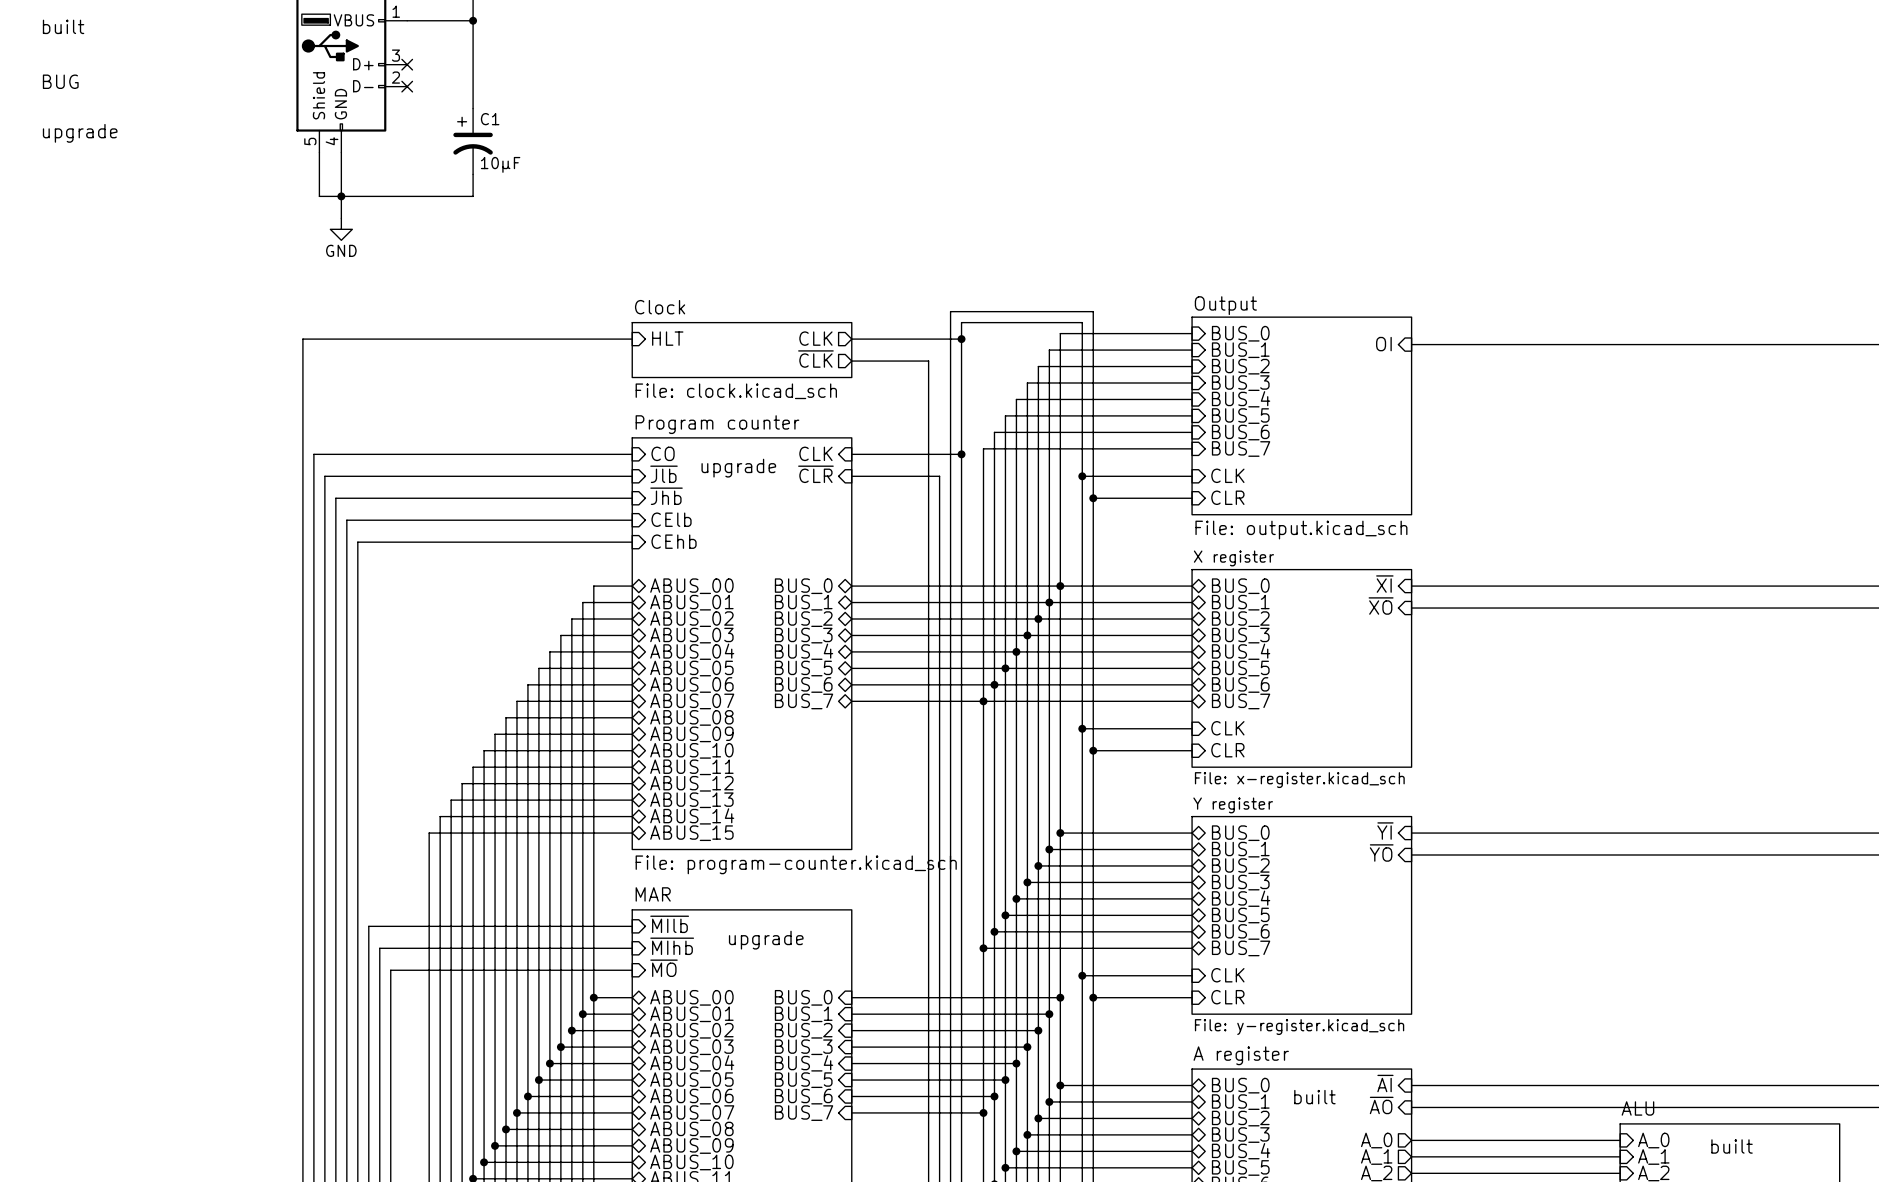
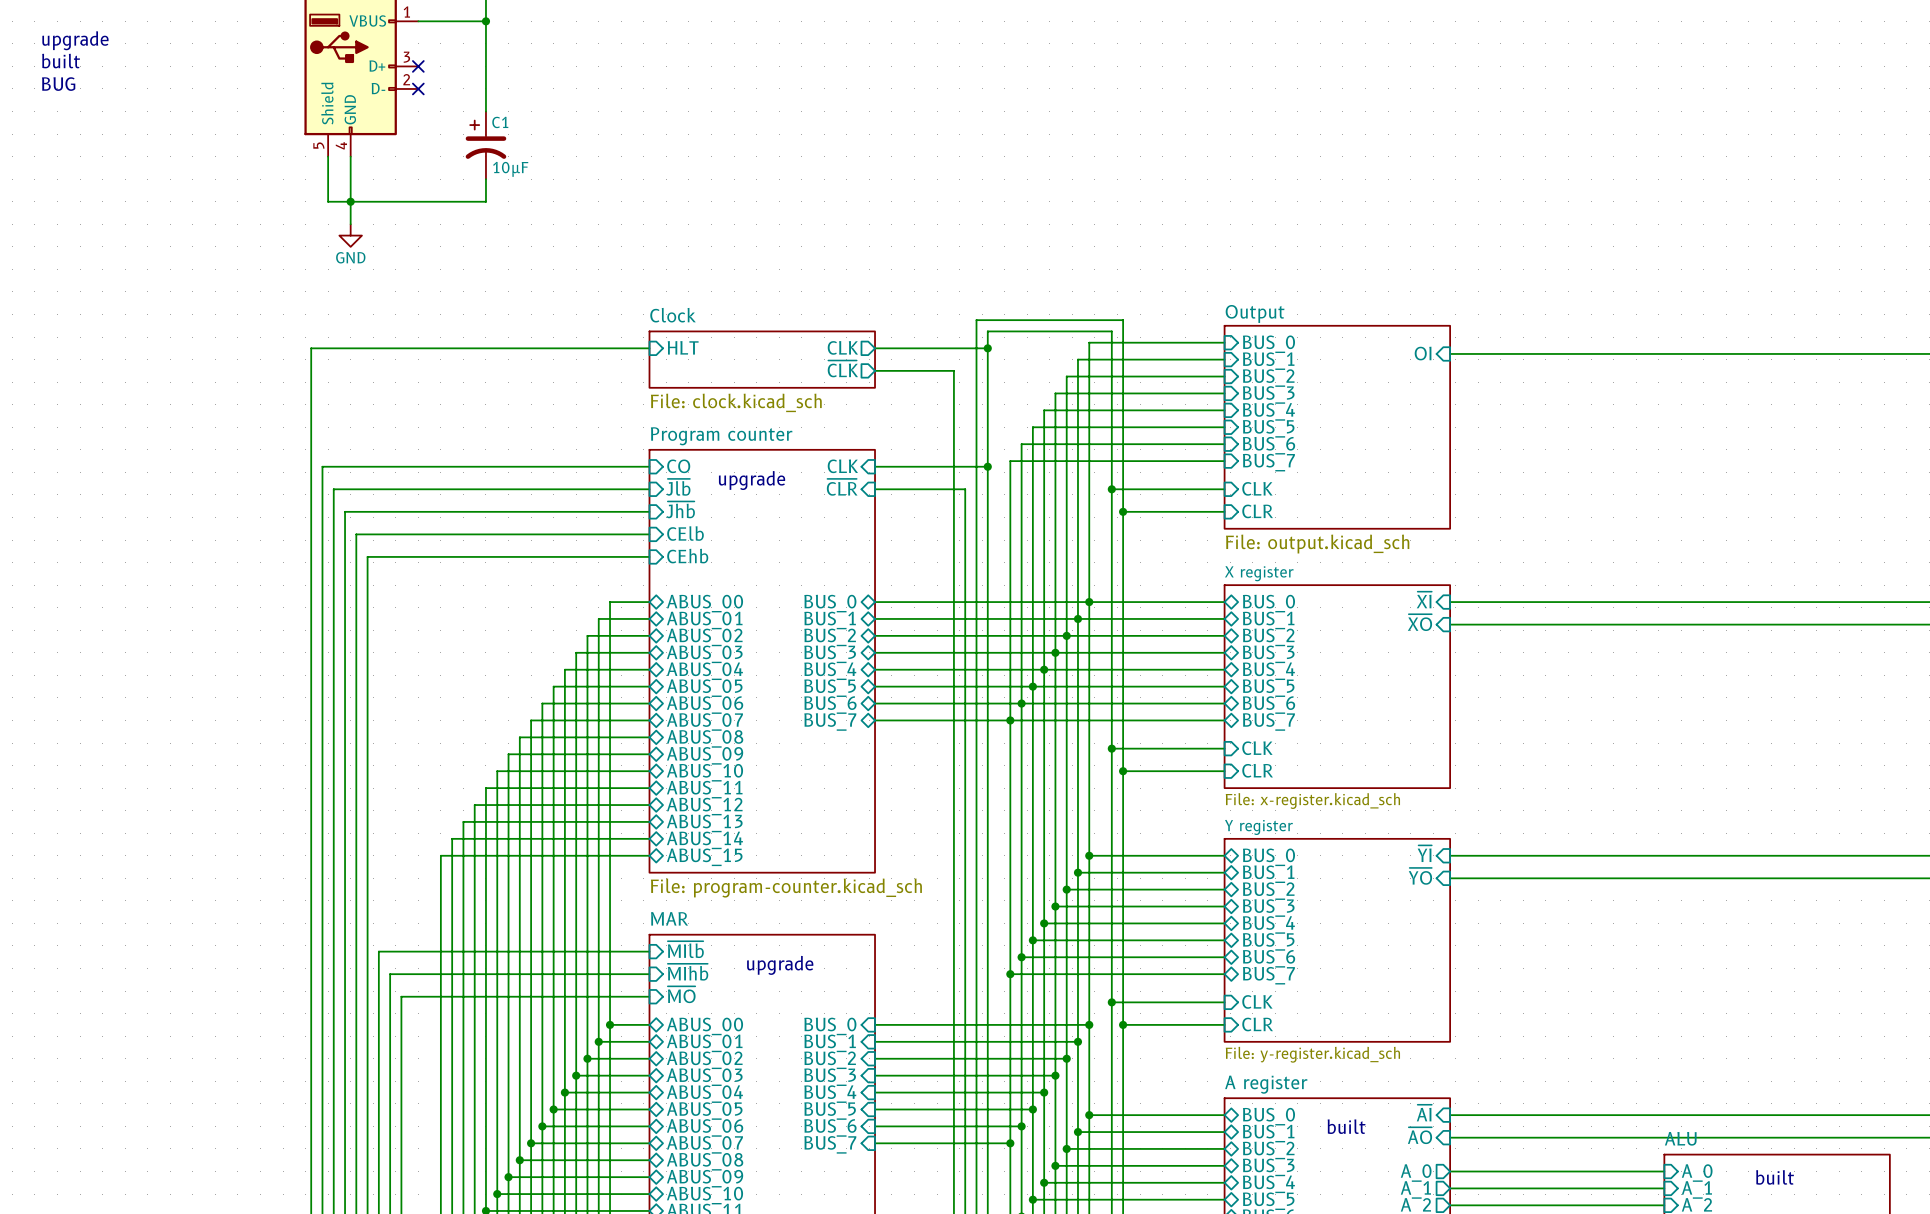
text position: built (63, 26) -> built (61, 61)
text position: upgrade (80, 133) -> upgrade (75, 40)

